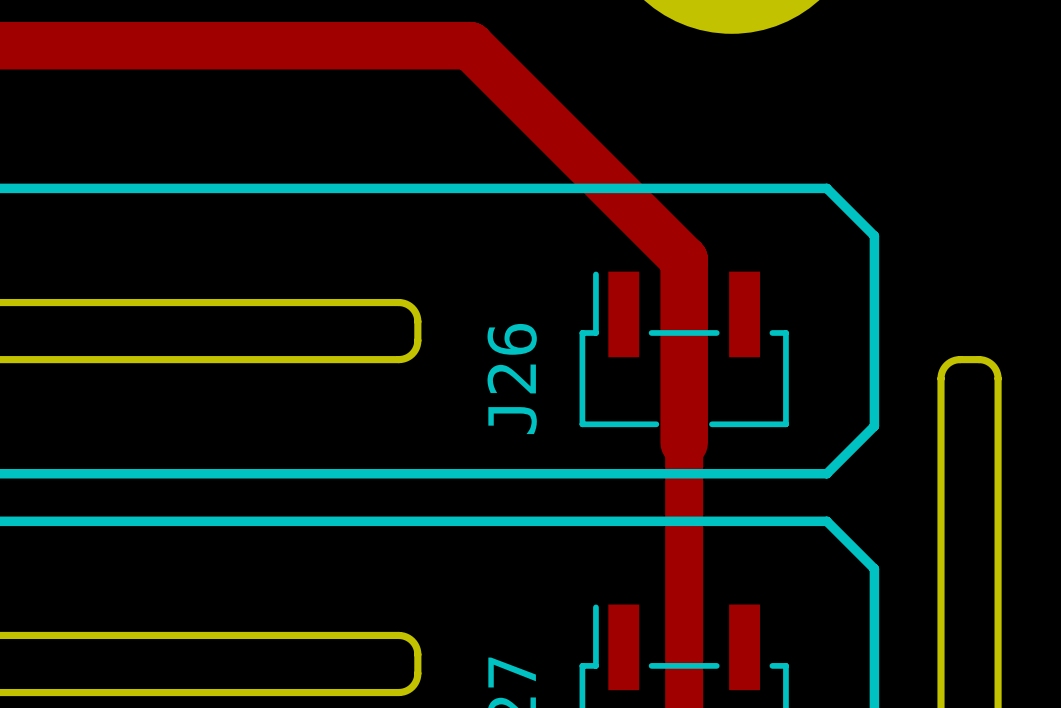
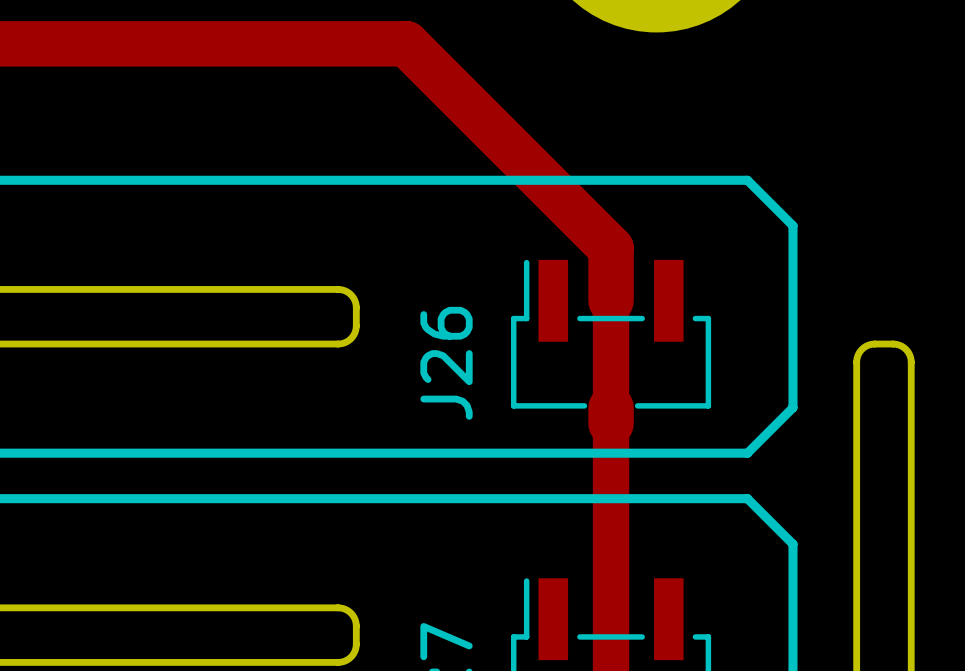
top track width: thick (684, 314) (684, 426) -> thin (611, 300) (611, 407)

